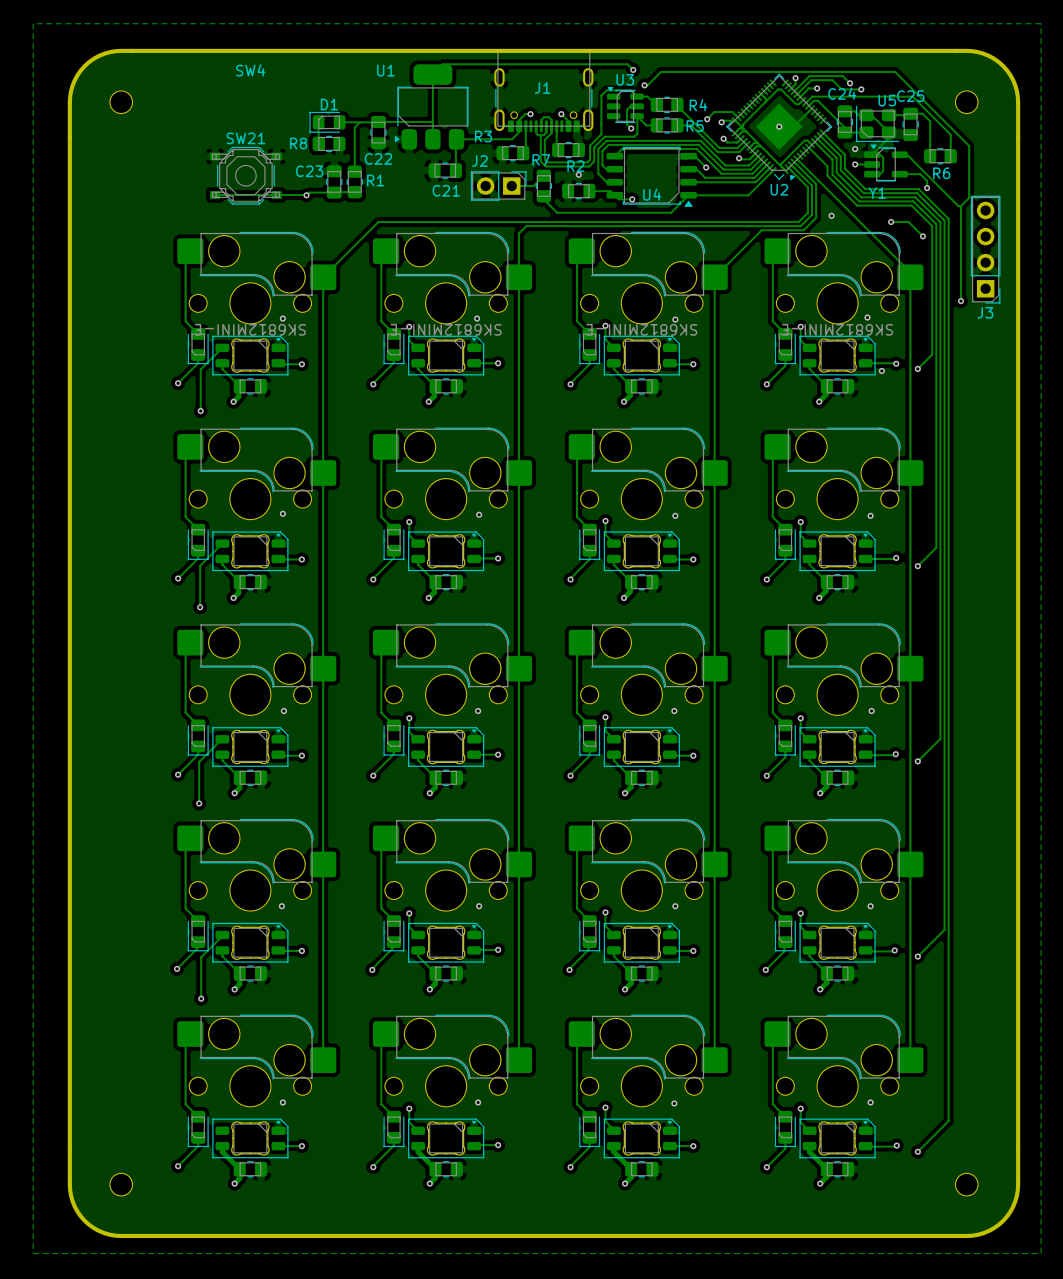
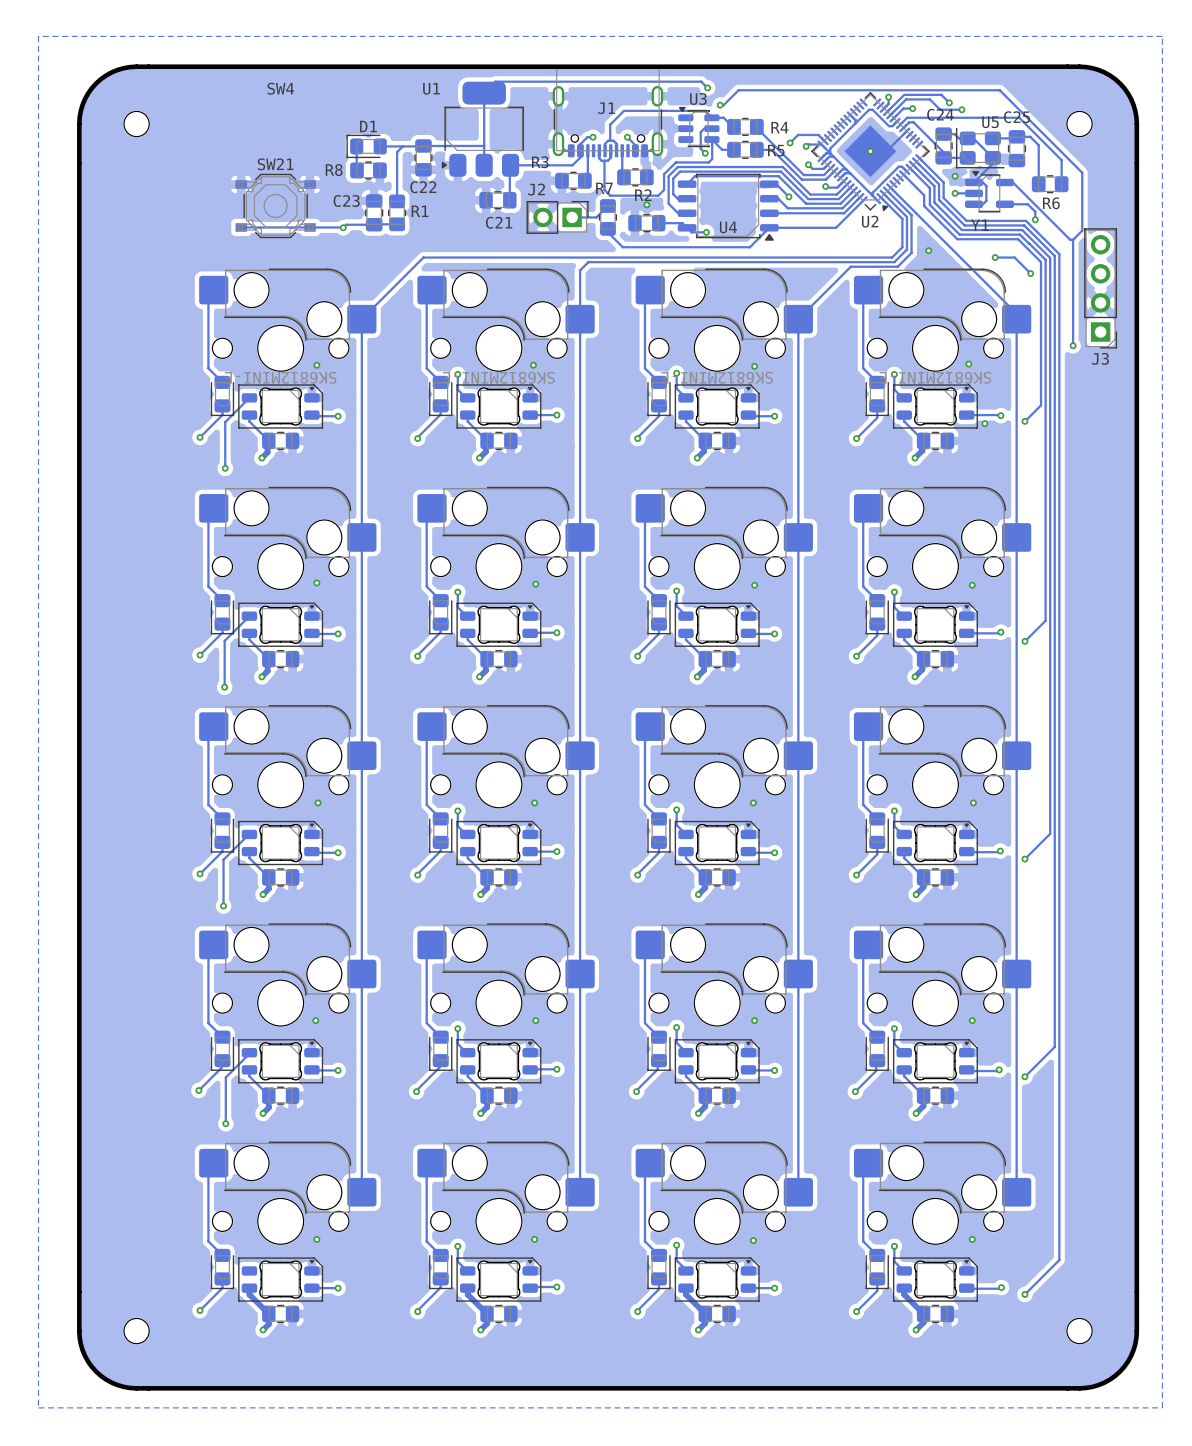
track: (606, 90) (601, 95) (601, 134) (590, 145) (590, 159) (587, 162) (547, 162) (544, 159) (544, 139) (551, 133) (551, 126) -> (677, 110) (623, 110) (610, 124) (610, 140)

